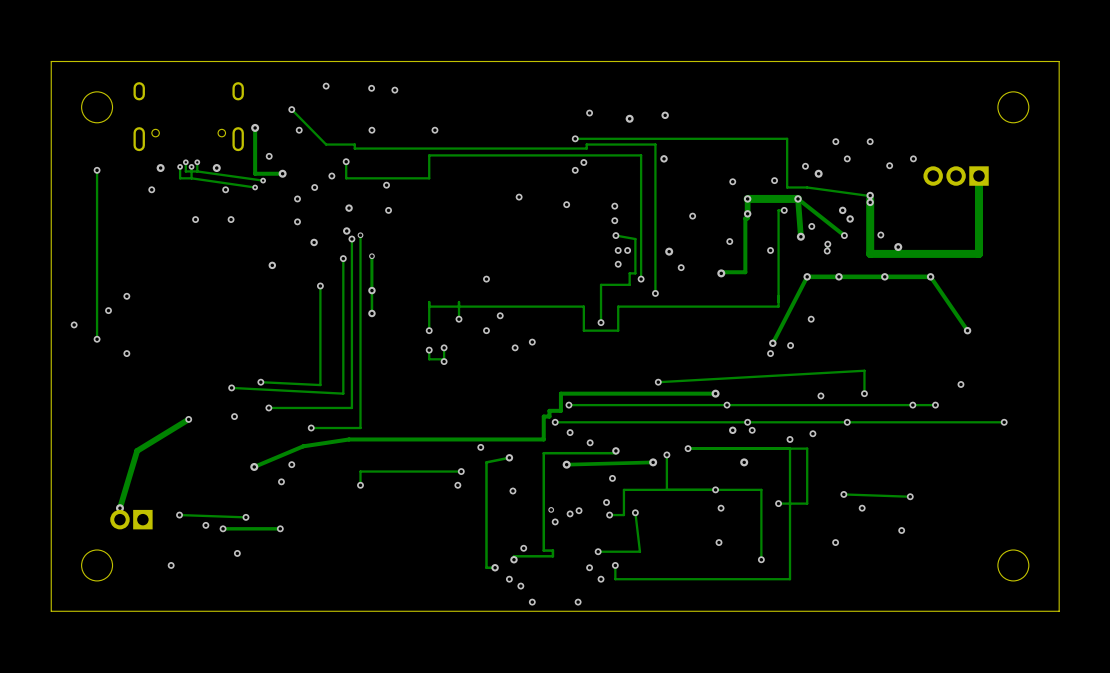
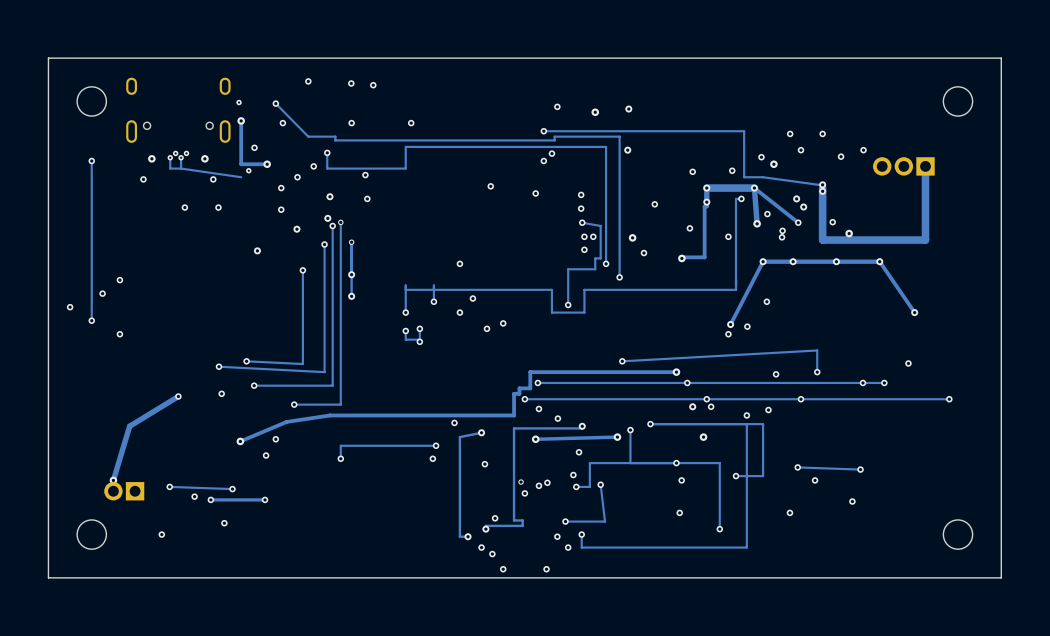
via: none -> (239, 102)
track: (185, 162) (185, 171) (197, 171) -> none
track: (197, 162) (197, 171) -> none
track: (197, 171) (263, 180) -> none
via: (255, 187) -> none

